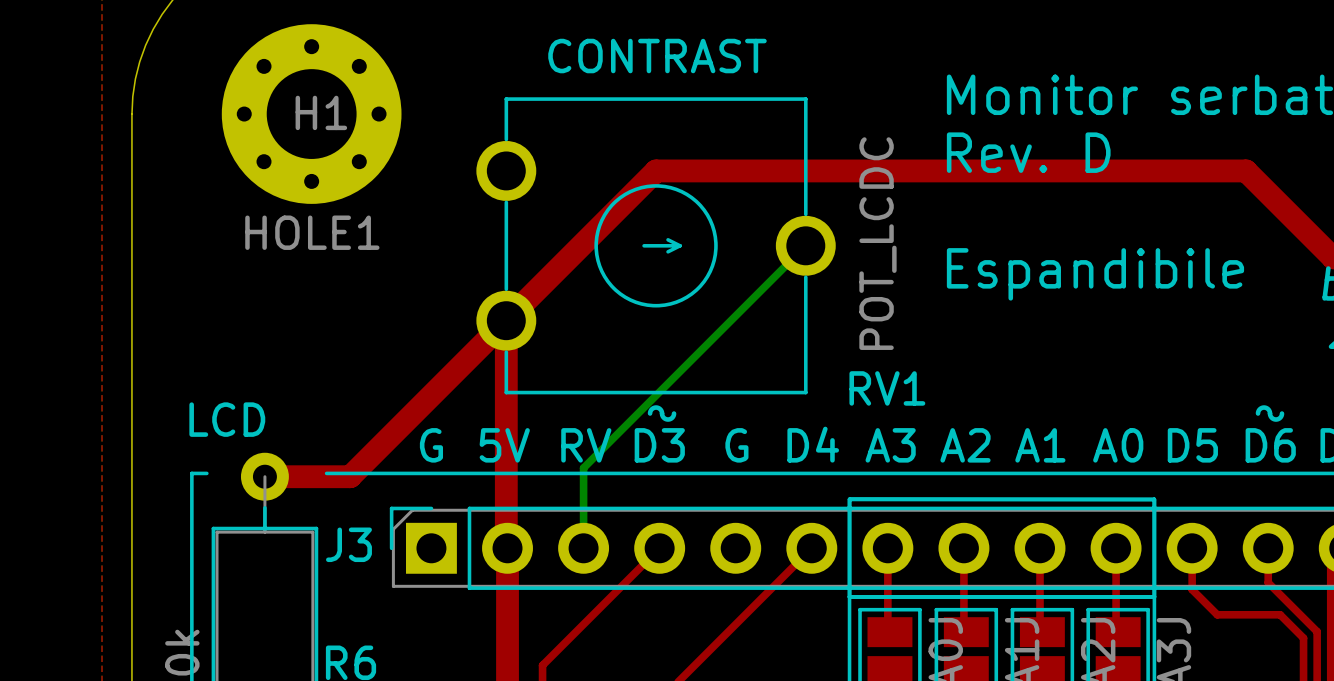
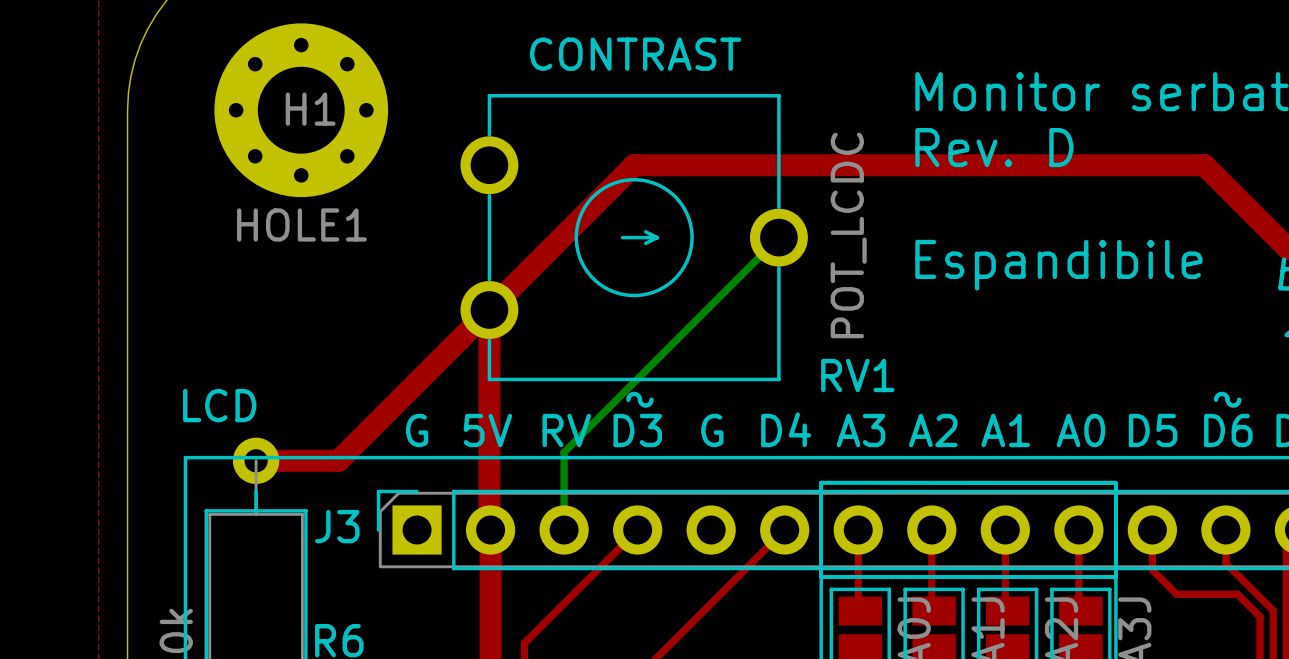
line: none -> (199, 457) (315, 457)

